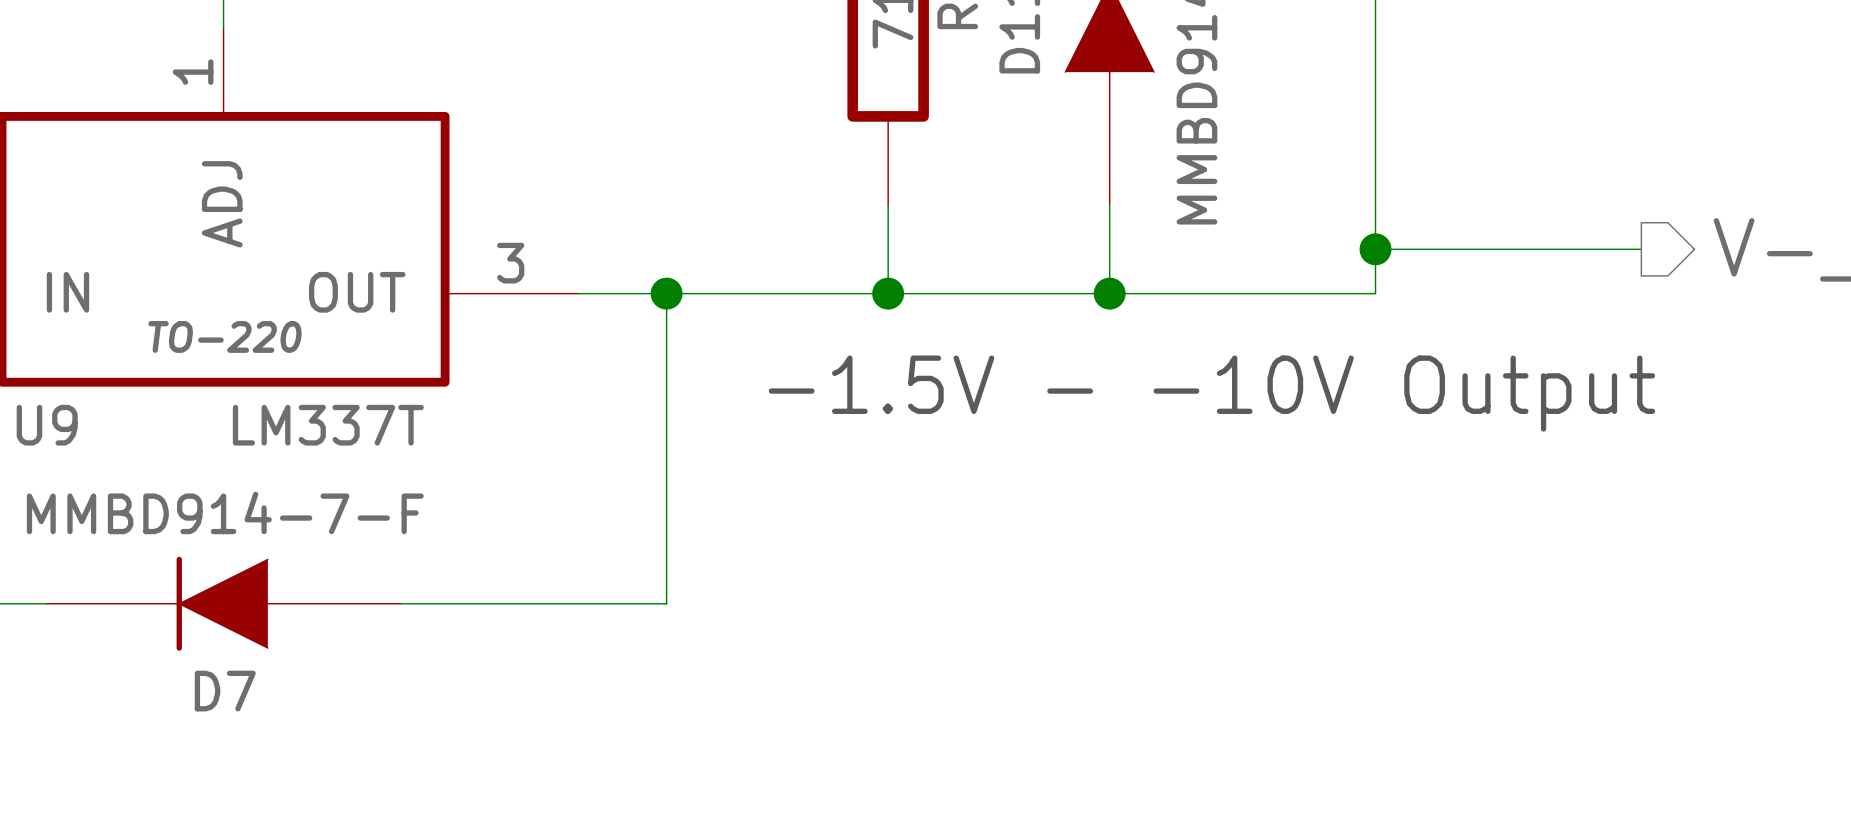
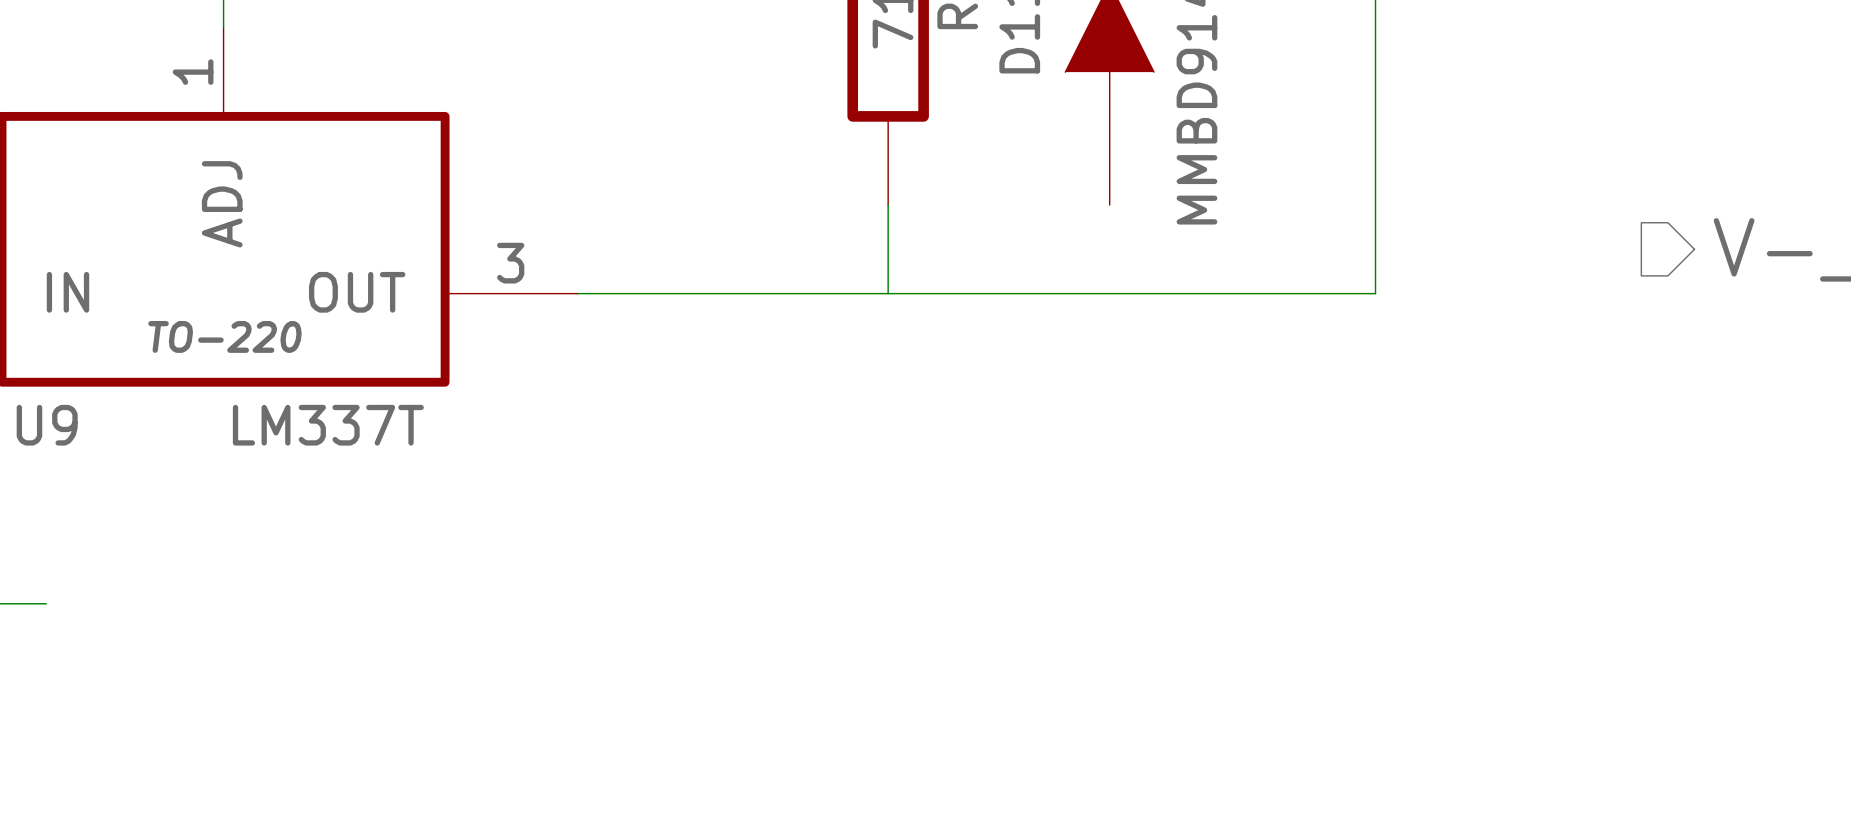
wire: (1109, 205) (1109, 293) -> none
wire: (1375, 249) (1641, 249) -> none
junction: (1375, 249) -> none
wire: (666, 293) (666, 603) (400, 603) -> none
junction: (666, 293) -> none
junction: (888, 293) -> none
junction: (1109, 293) -> none
text: -1.5V - -10V Output (1211, 393) -> none
D7: MMBD914-7-F (223, 603) -> none

